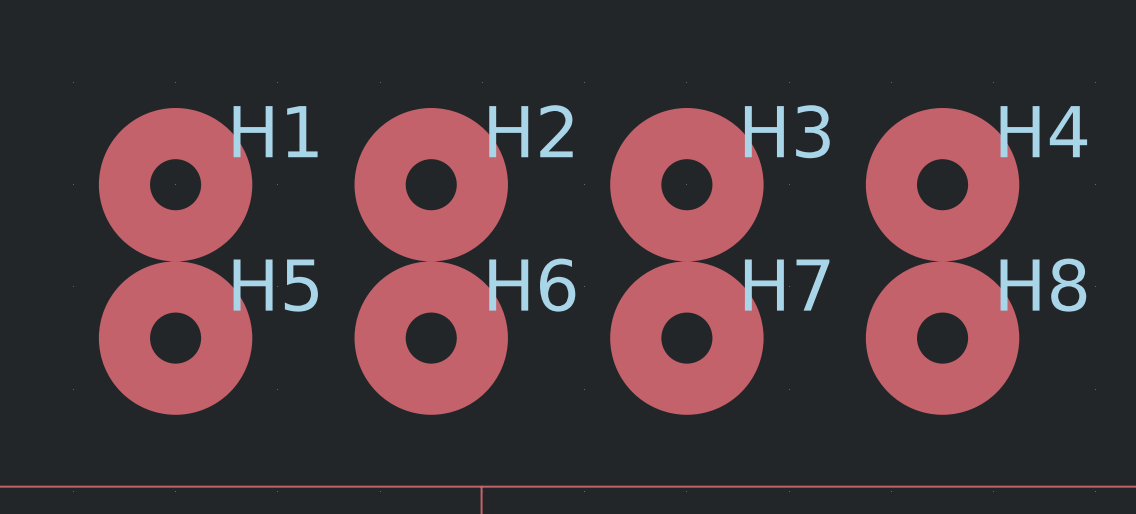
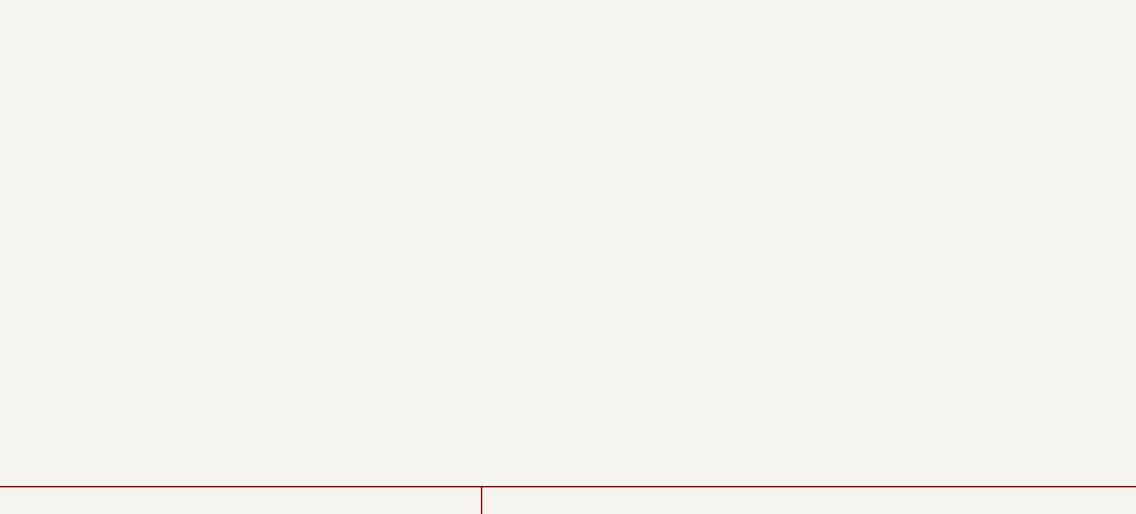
H1: (175, 184) -> none
H2: (431, 184) -> none
H3: (686, 184) -> none
H4: (942, 184) -> none
H5: (175, 338) -> none
H6: (431, 338) -> none
H7: (686, 338) -> none
H8: (942, 338) -> none

